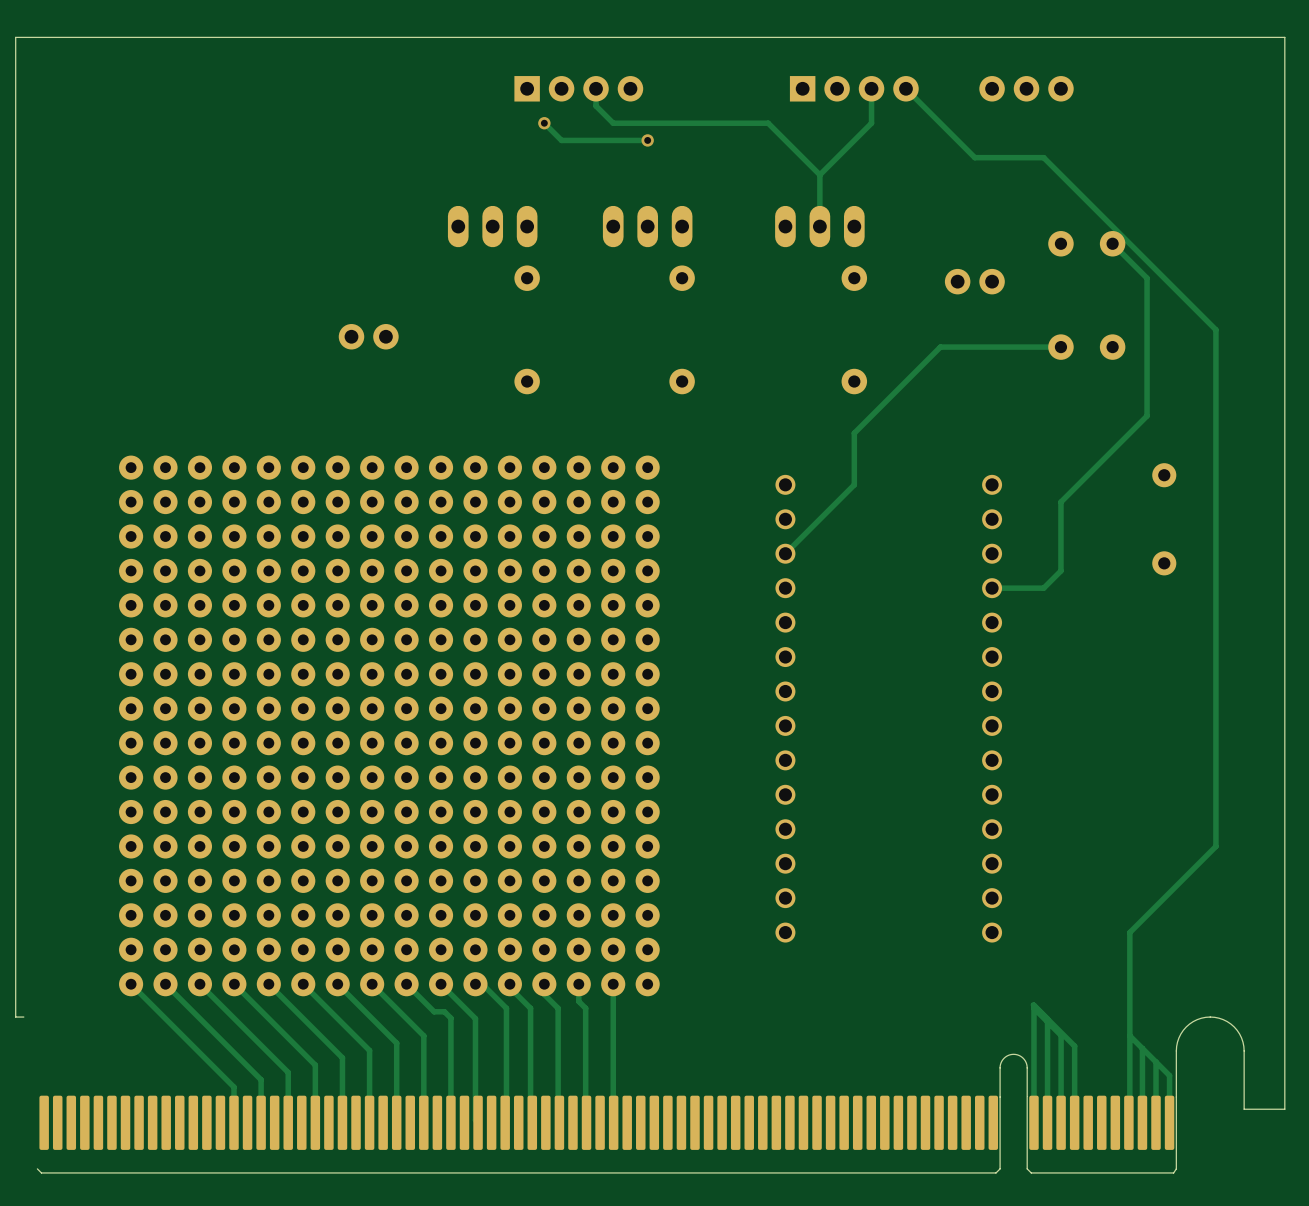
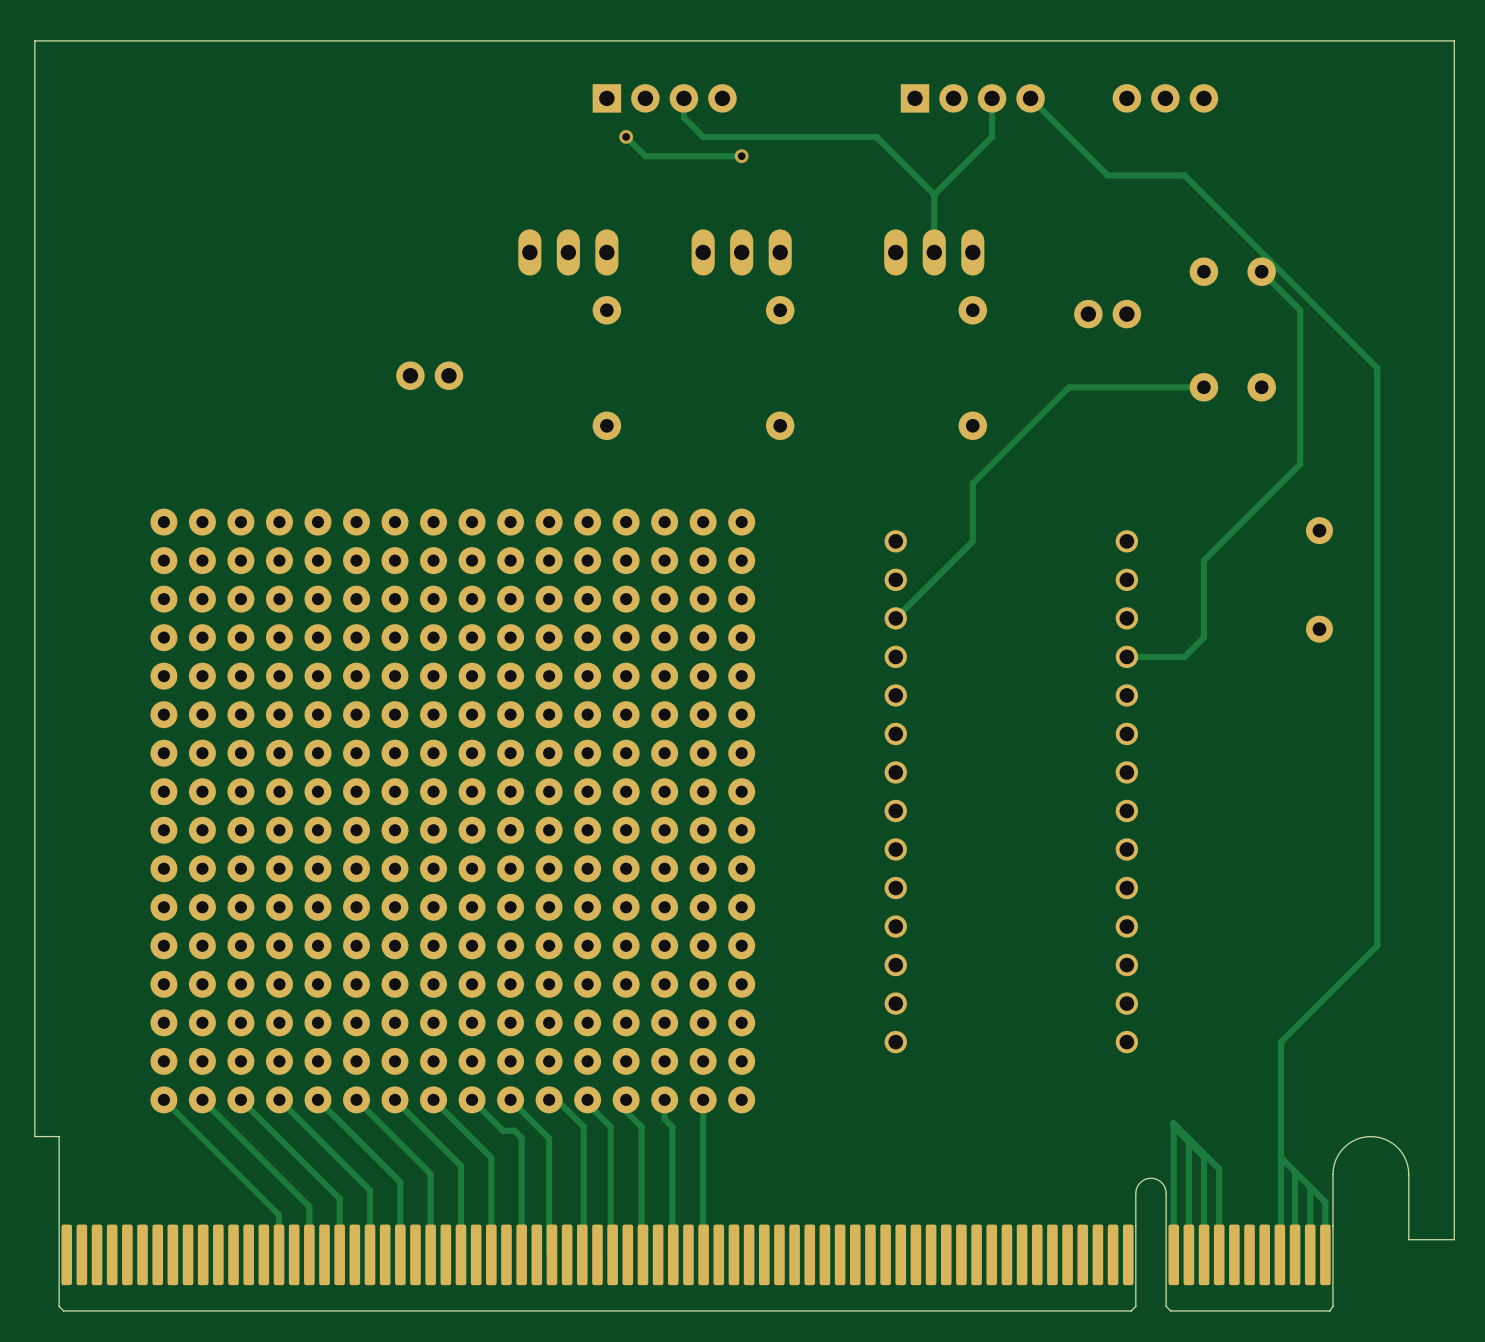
part footprint: [37, 1017, 1285, 1173] -> [43, 1136, 1455, 1311]

